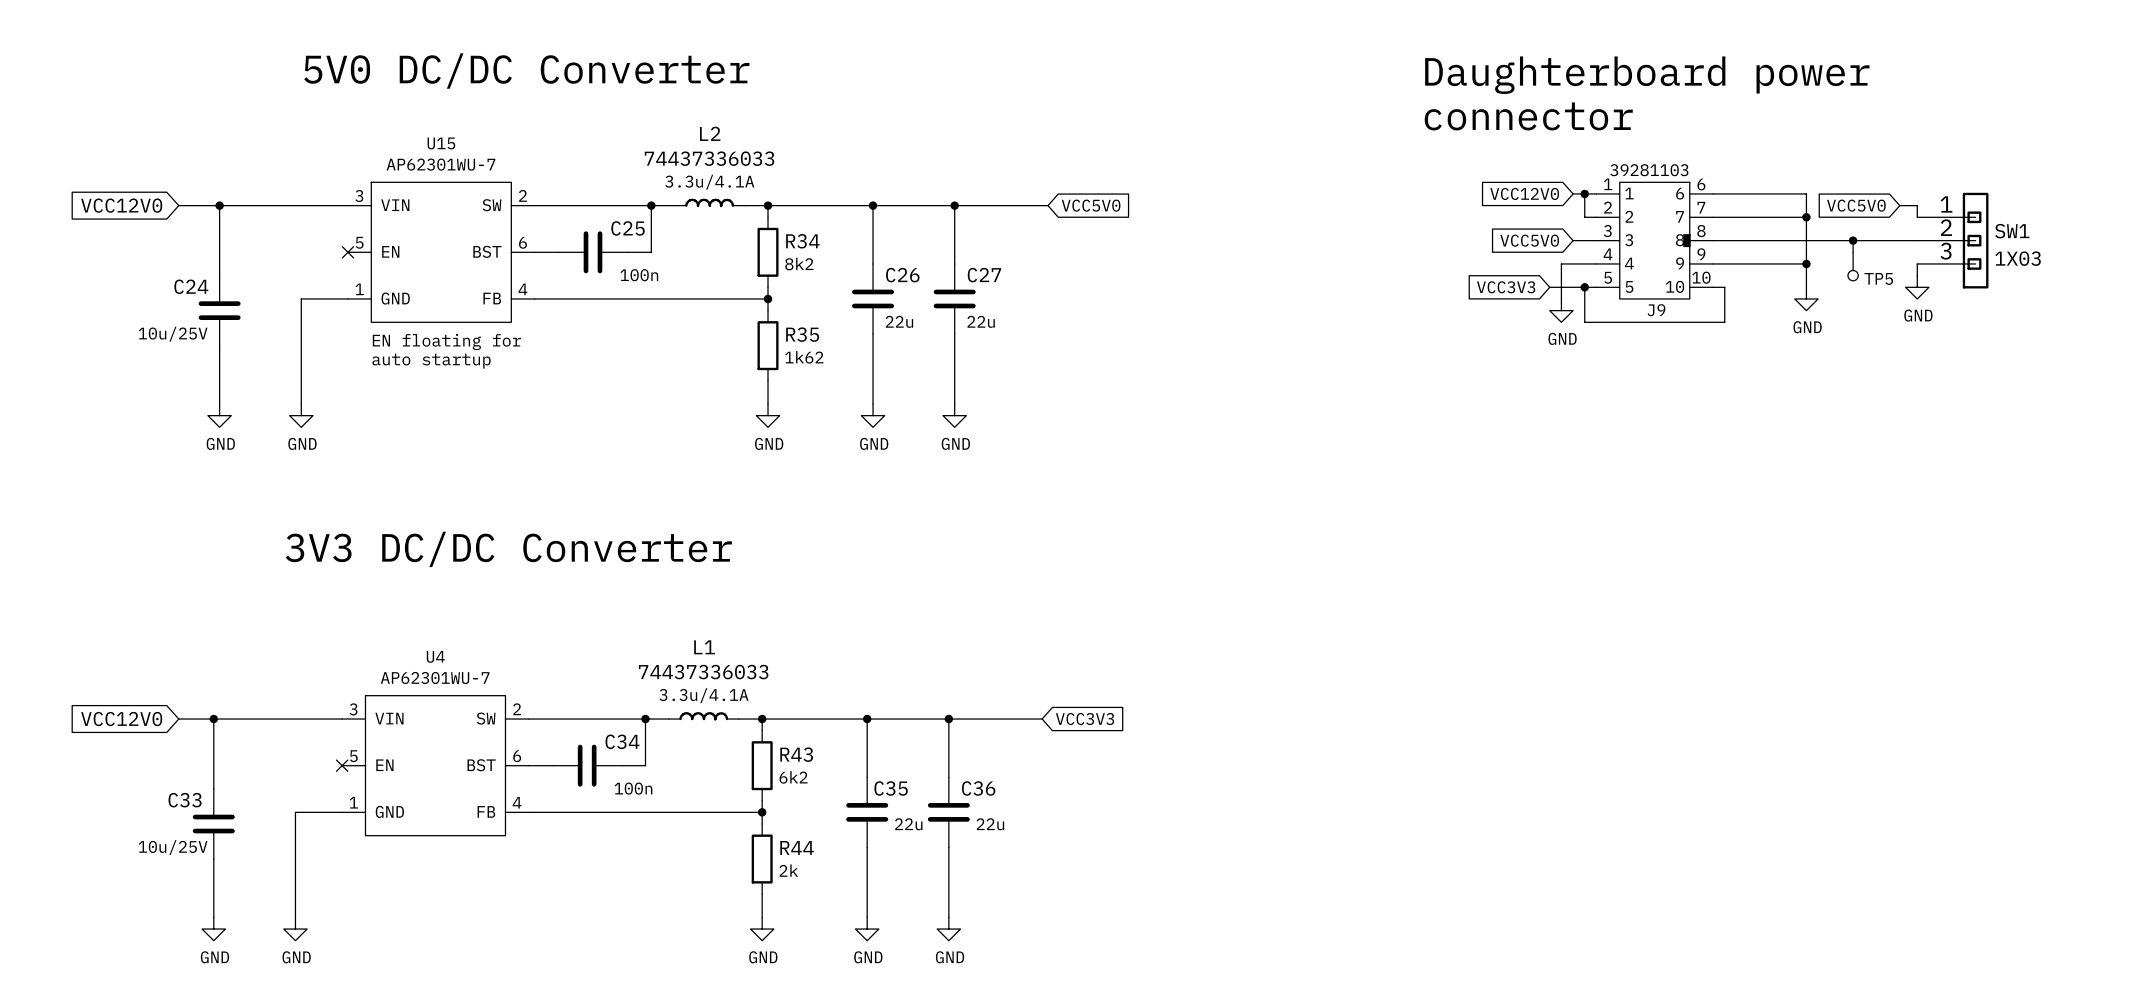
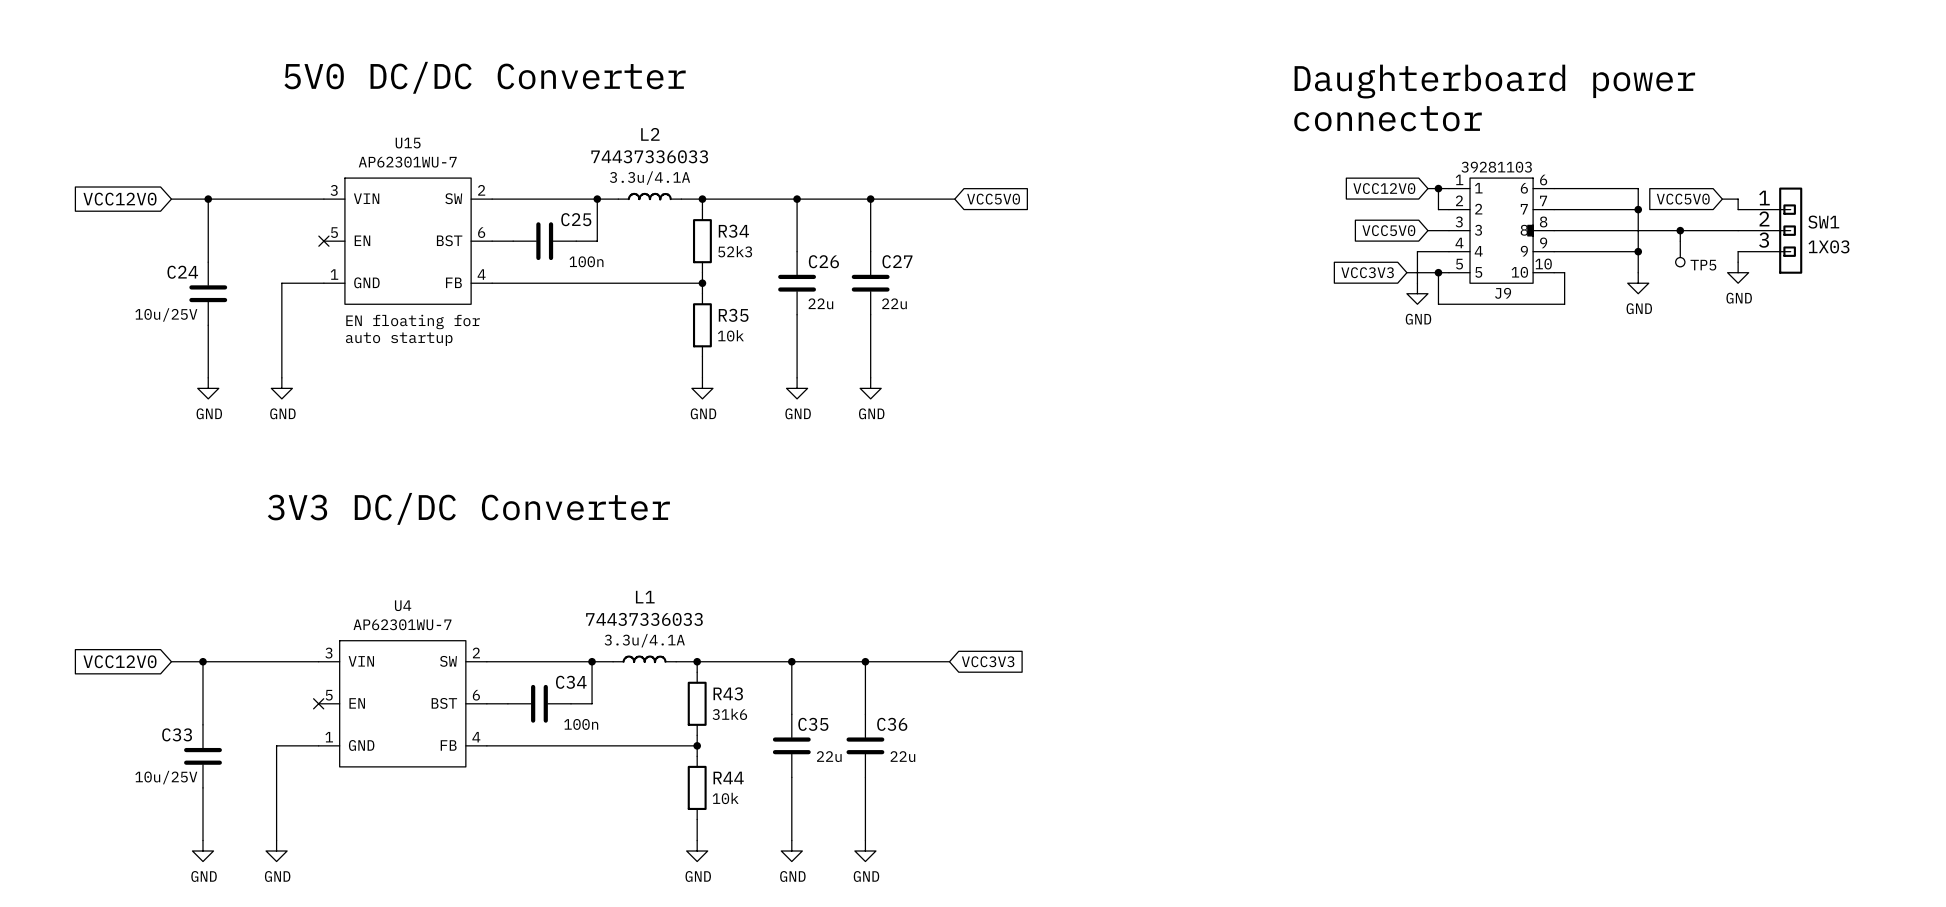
R34 text: 8k2 (799, 263) -> 52k3 (735, 251)
R35 text: 1k62 (804, 357) -> 10k (730, 335)
R43 text: 6k2 (793, 777) -> 31k6 (729, 714)
R44 text: 2k (788, 870) -> 10k (725, 798)

